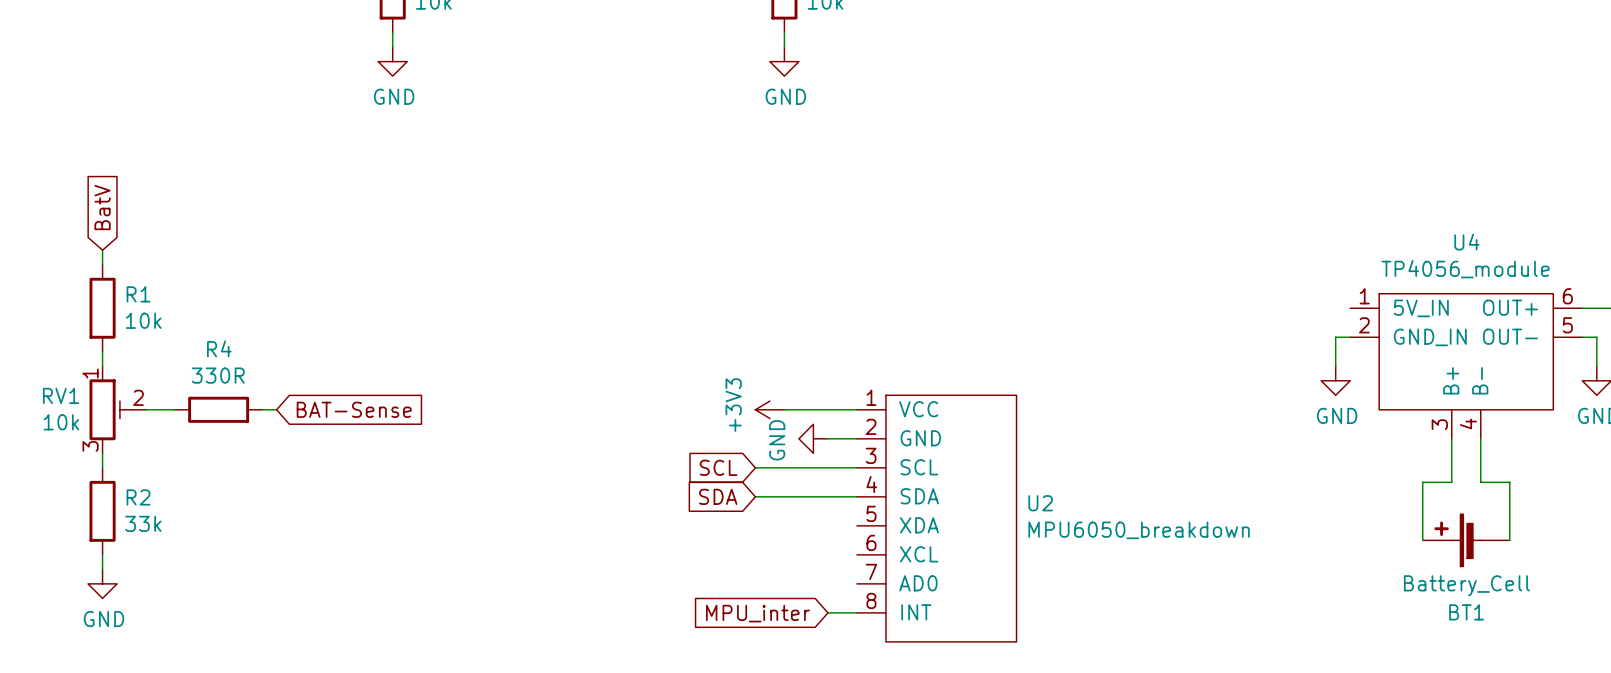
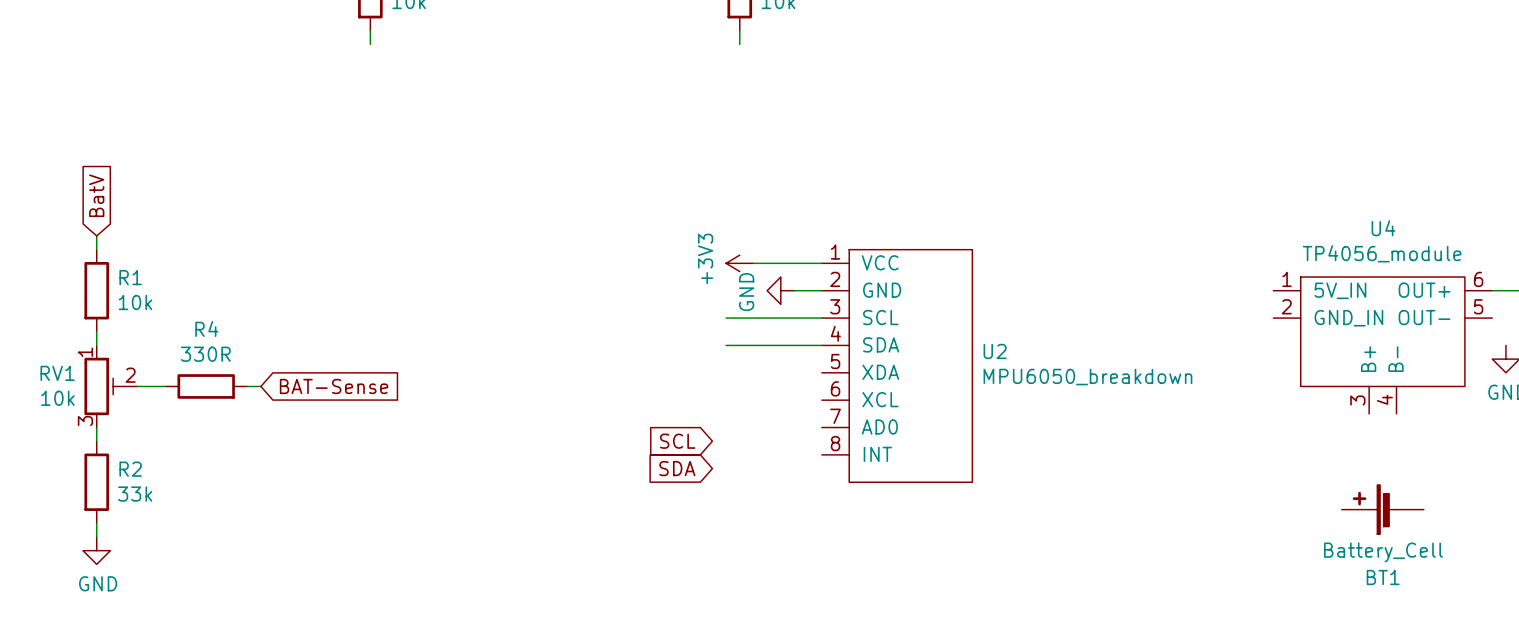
power symbol: GND (392, 61) -> none
power symbol: GND (784, 61) -> none
power symbol: none -> GND (780, 290)
wire: (1350, 337) (1335, 337) (1335, 366) -> none
wire: (1582, 337) (1596, 337) (1596, 366) -> none
power symbol: GND (1335, 380) -> none
power symbol position: +3V3 (769, 409) -> +3V3 (739, 263)
wire: (784, 409) (856, 409) -> (753, 263) (821, 263)
power symbol: GND (813, 438) -> none
wire: (827, 438) (856, 438) -> (794, 290) (821, 290)
wire: (1451, 438) (1451, 482) (1422, 482) (1422, 540) -> none
wire: (1480, 438) (1480, 482) (1509, 482) (1509, 540) -> none
wire: (755, 467) (856, 467) -> (726, 318) (821, 318)
wire: (755, 496) (856, 496) -> (726, 345) (821, 345)
U2 position: (936, 518) -> (897, 365)
wire: (827, 612) (856, 612) -> none
global label: MPU_inter (757, 613) -> none

